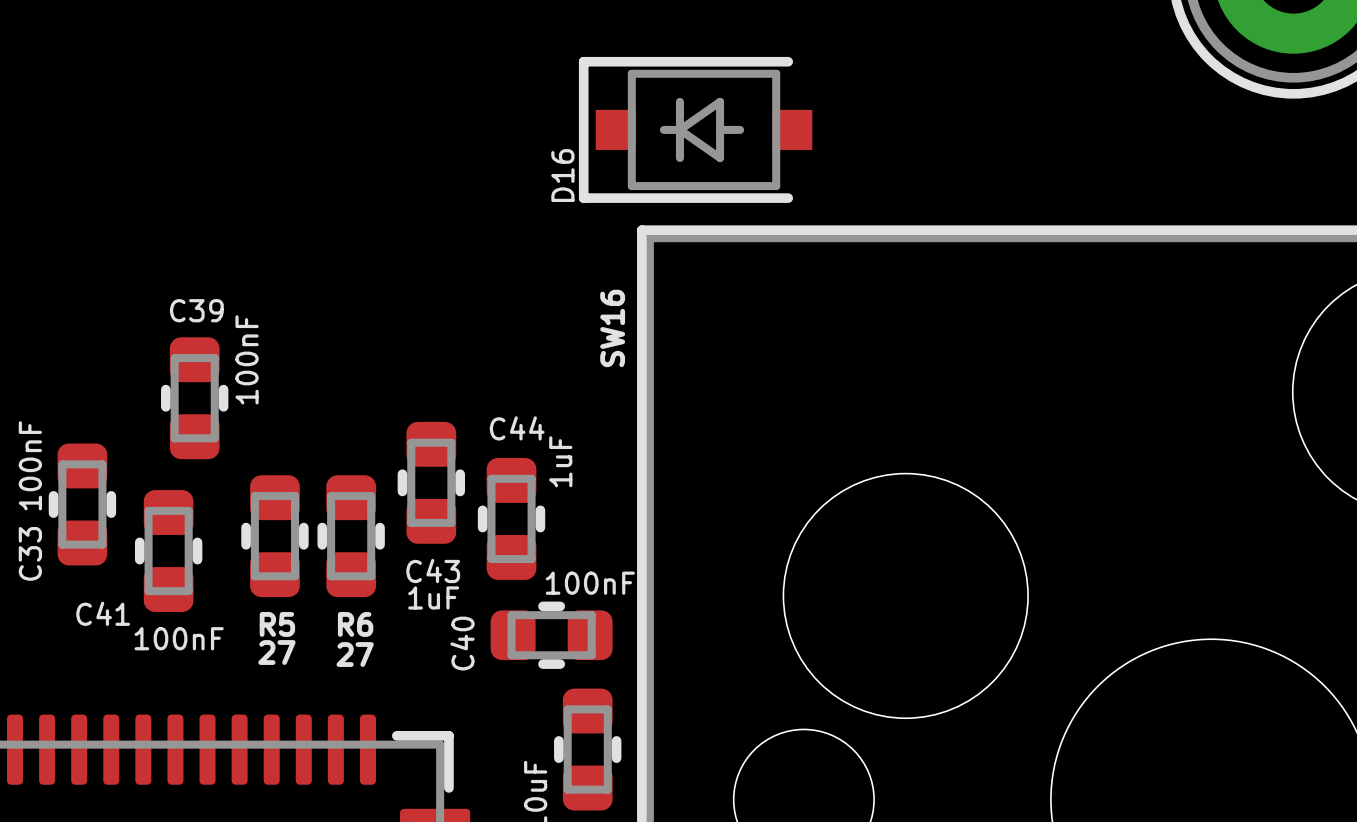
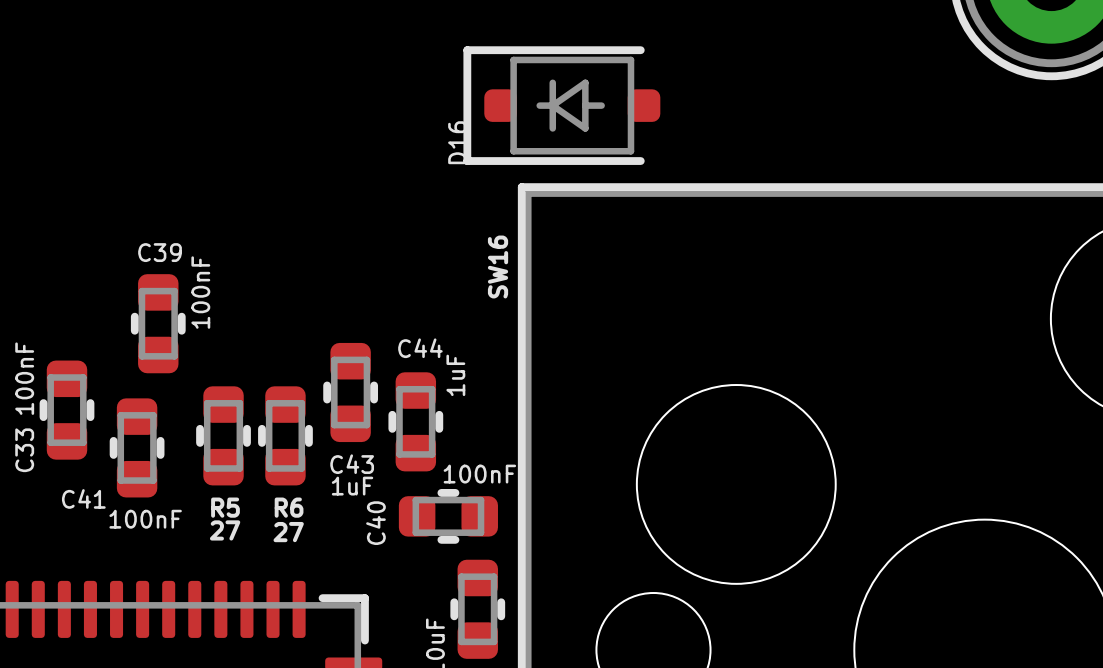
D16 footprint: [578, 56, 813, 203] -> [463, 46, 661, 165]

